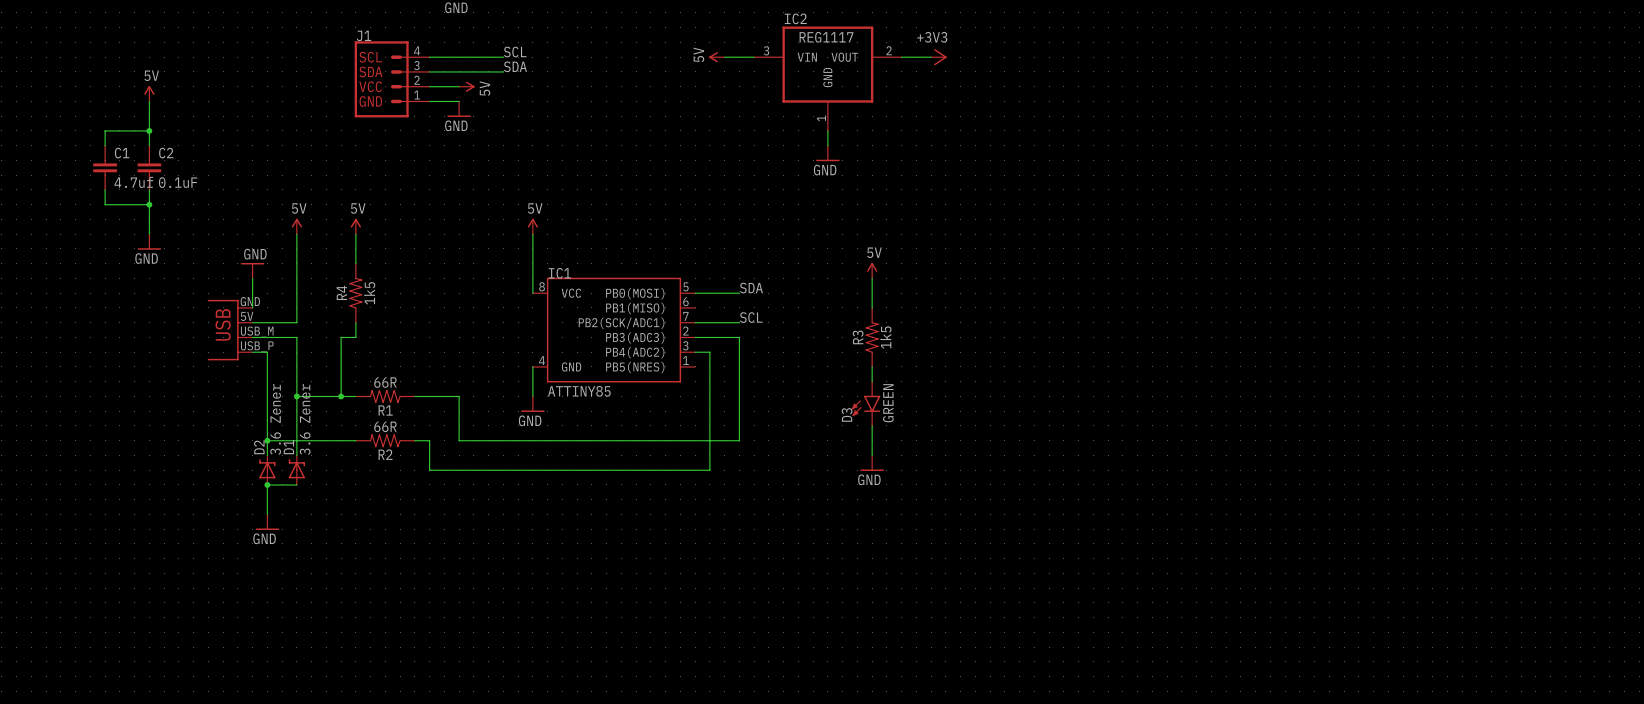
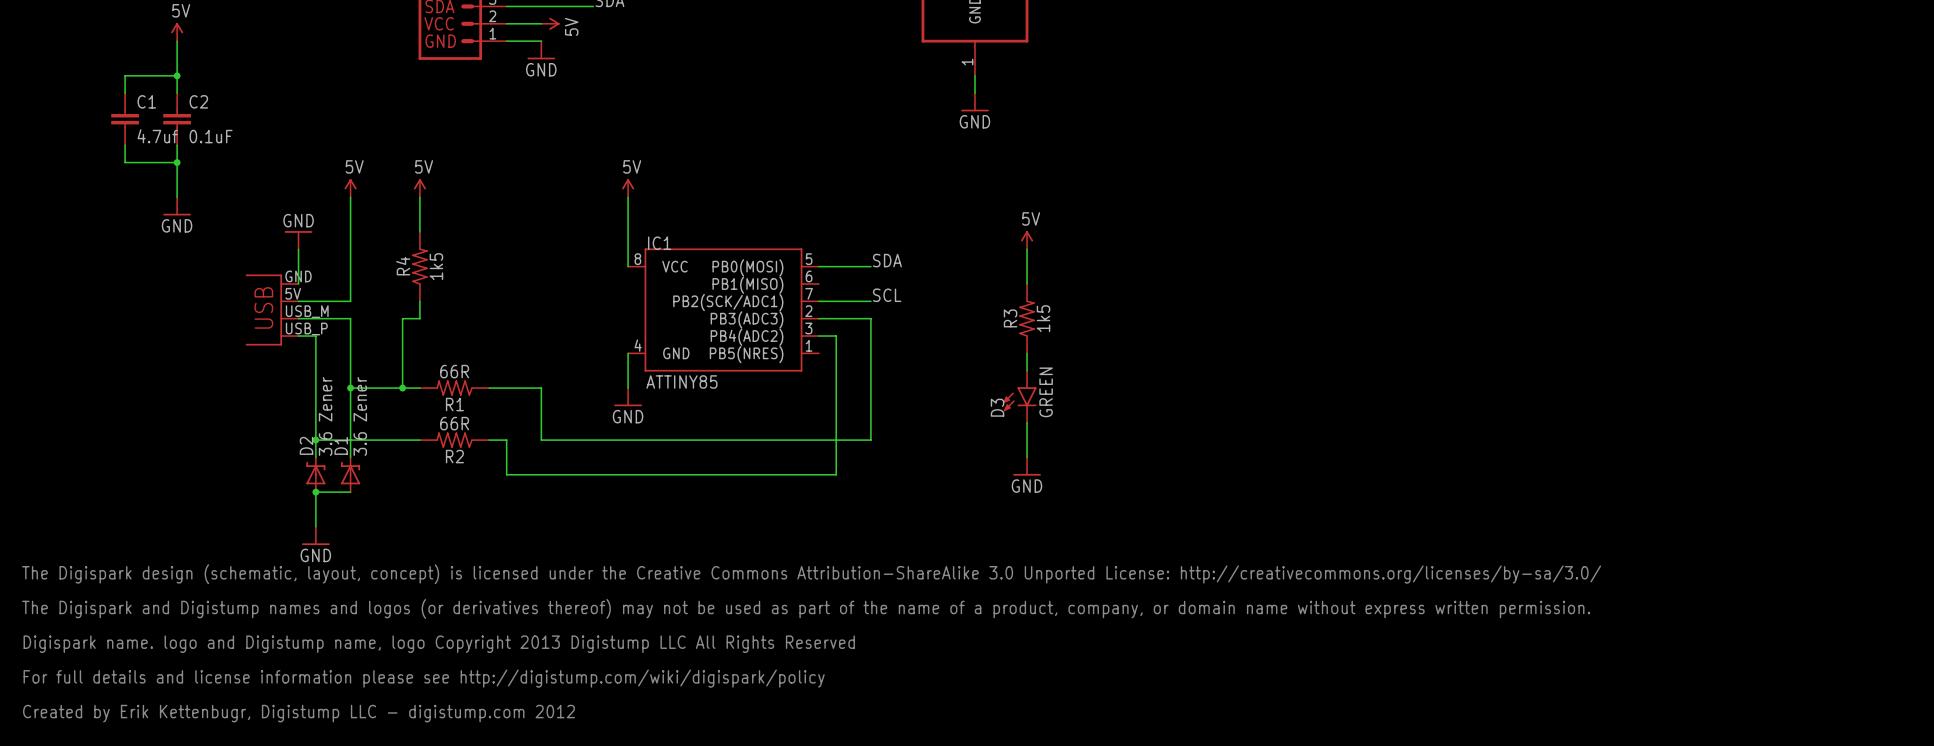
text: none -> The Digispark design (schematic, layout, concept) is licensed under the Creative Commons Attribution-ShareAlike 3.0 Unported License: http://creativecommons.org/licenses/by-sa/3.0/ (811, 574)
text: none -> The Digispark and Digistump names and logos (or derivatives thereof) may not be used as part of the name of a product, company, or domain name without express written permission. (806, 608)
text: none -> Digispark name. logo and Digistump name, logo Copyright 2013 Digistump LLC All Rights Reserved (439, 644)
text: none -> For full details and license information please see http://digistump.com/wiki/digispark/policy (424, 678)
text: none -> Created by Erik Kettenbugr, Digistump LLC - digistump.com 2012 (298, 713)

